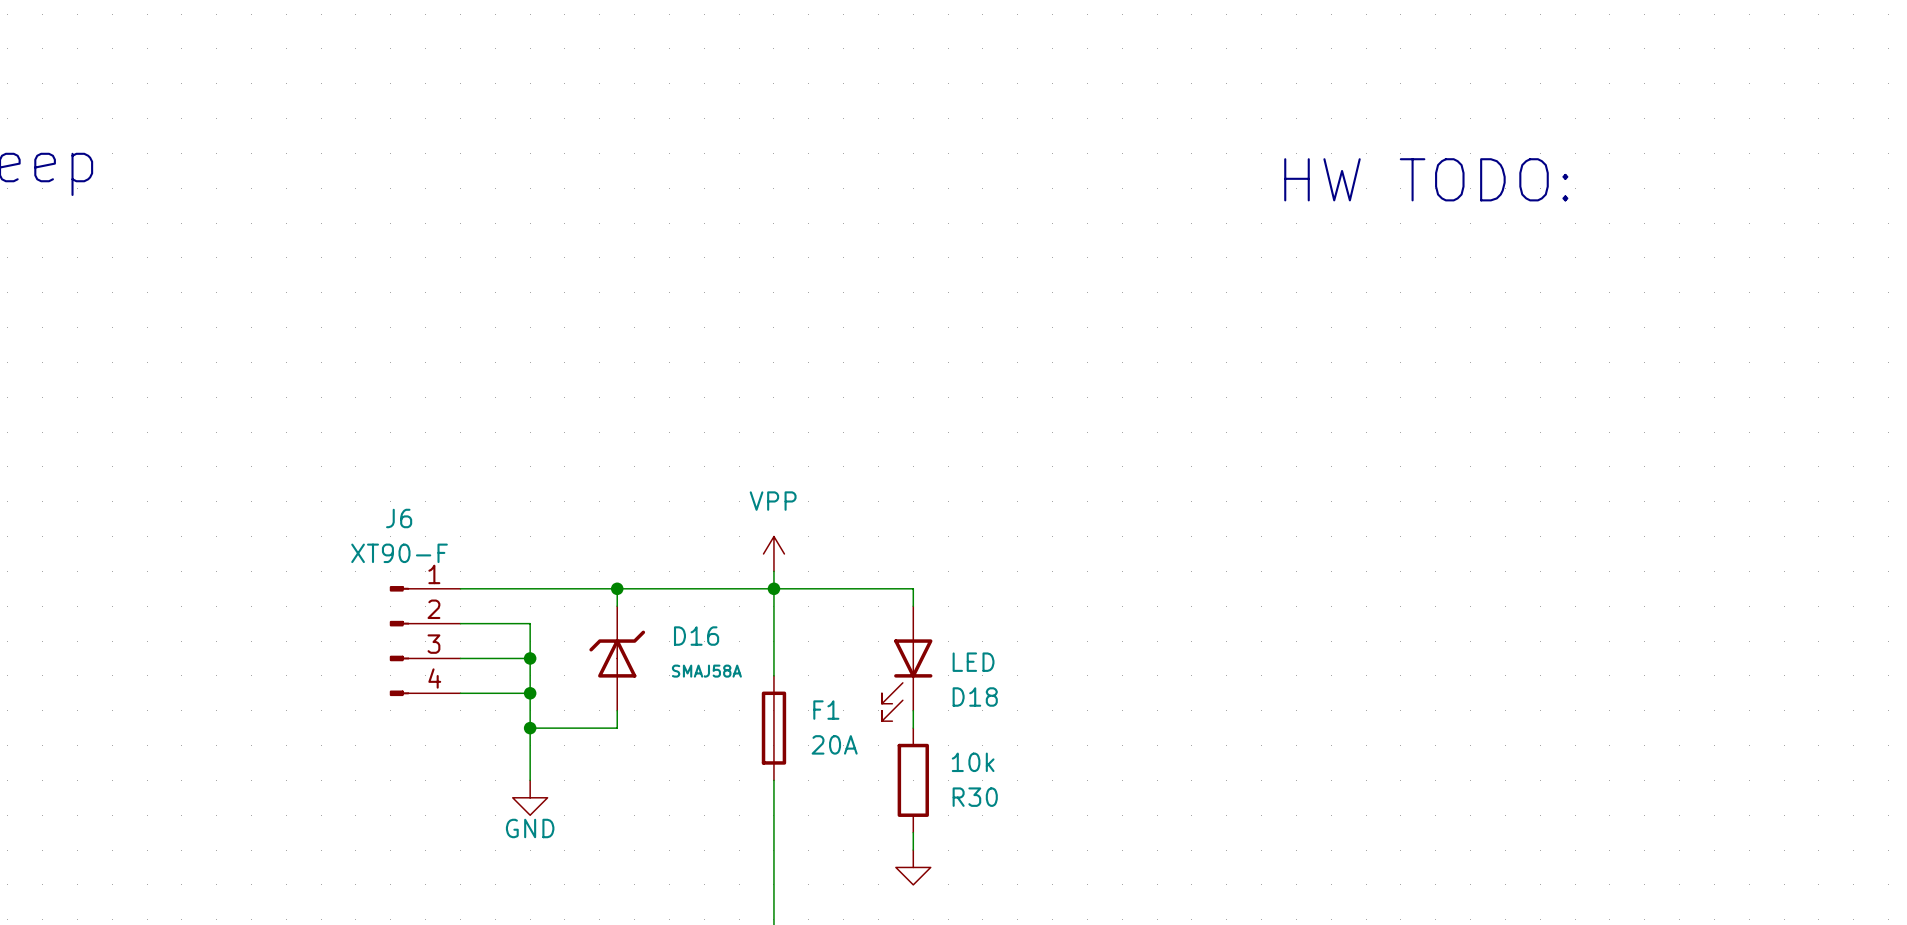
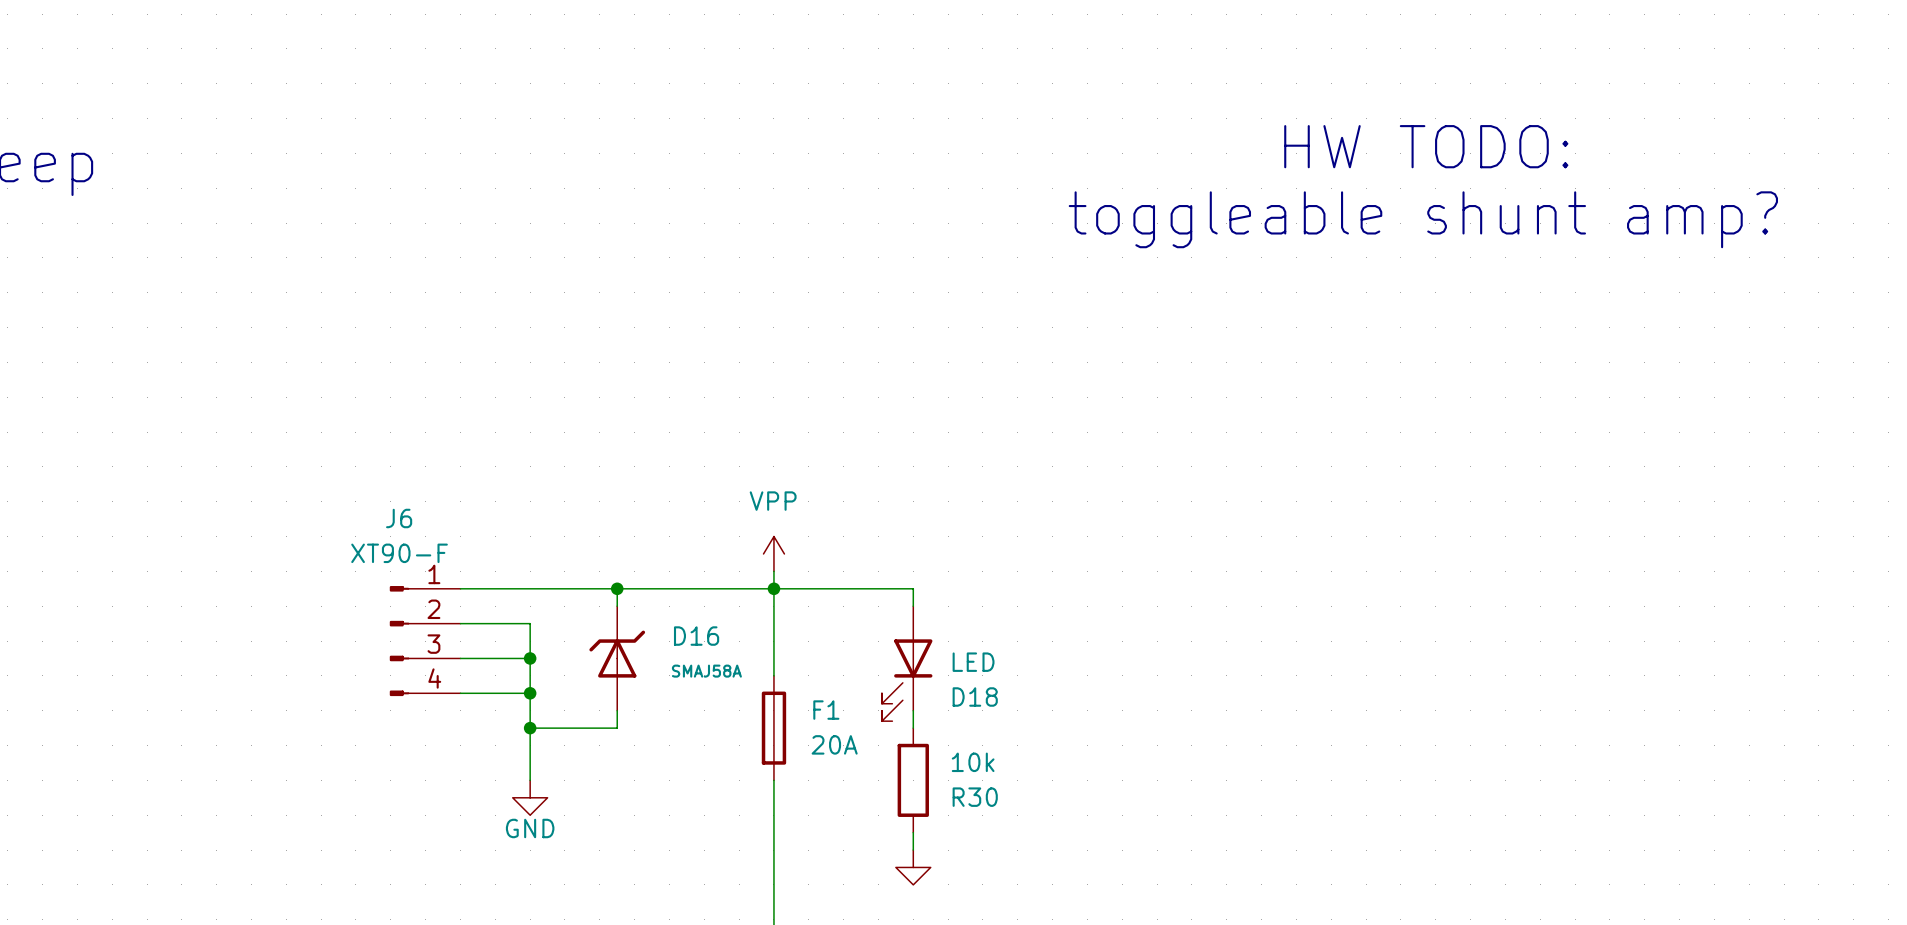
text position: HW TODO: (1426, 179) -> HW TODO: (1426, 146)
text: none -> toggleable shunt amp? (1423, 219)

